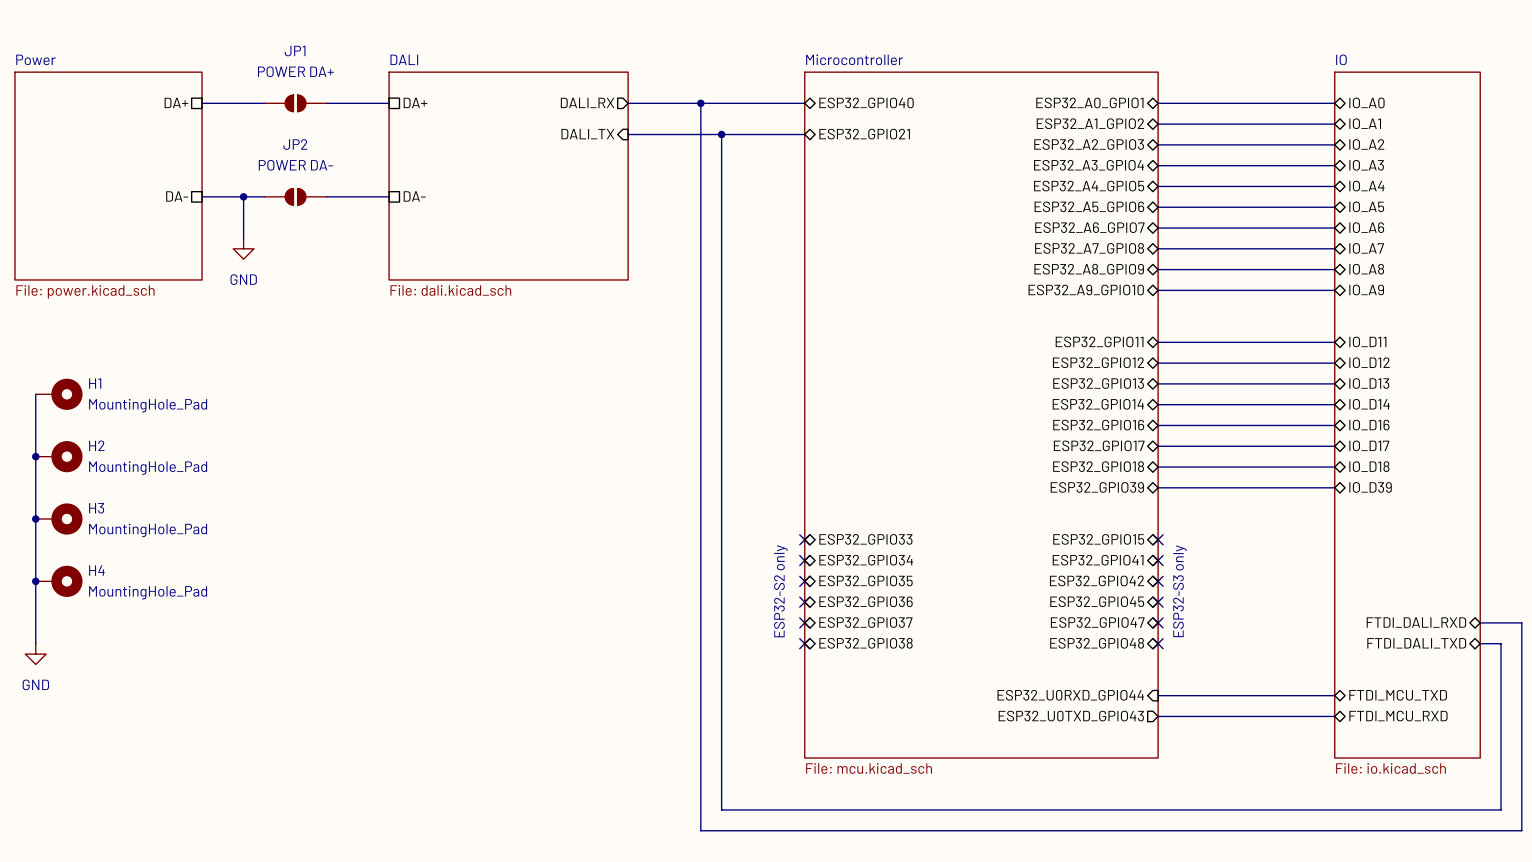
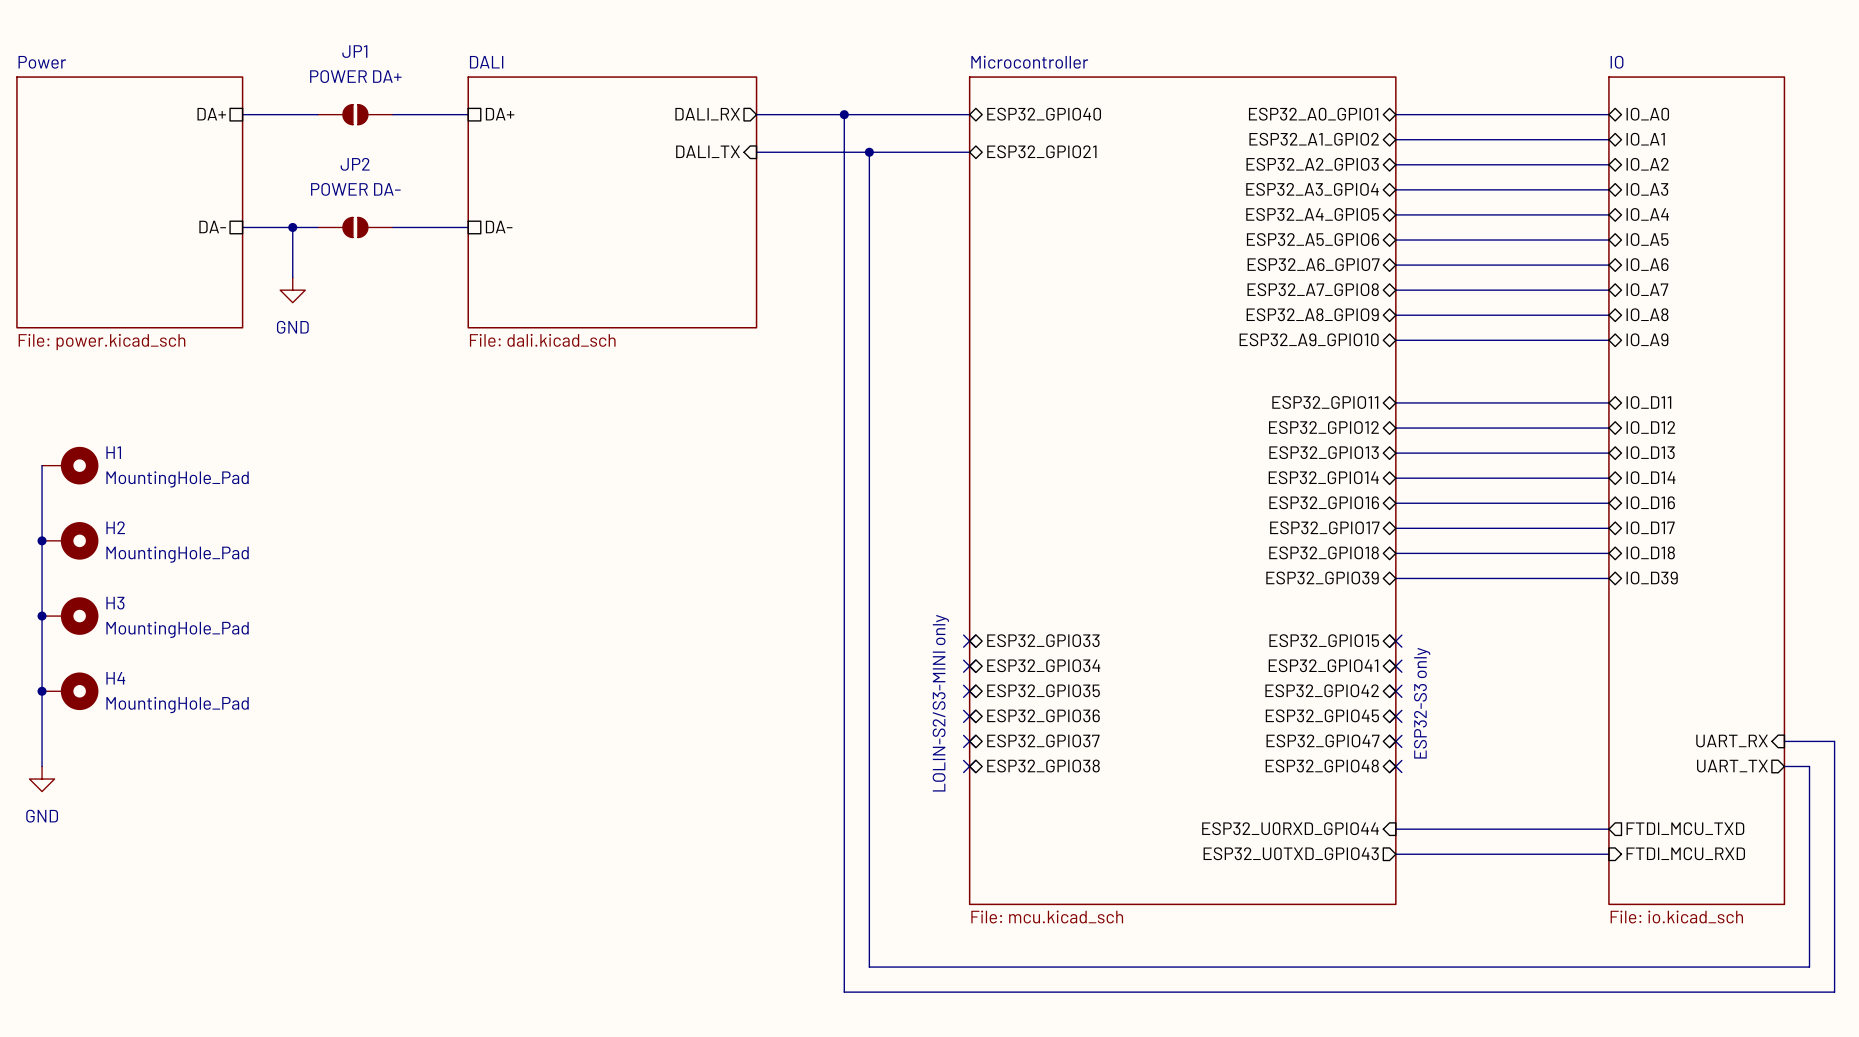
text: ESP32-S2 only (780, 591) -> LOLIN-S2/S3-MINI only (940, 703)
sheet pin shape: bidirectional (1416, 622) -> input (1732, 741)
sheet pin: FTDI_DALI_RXD (1416, 622) -> UART_RX (1732, 741)
sheet pin shape: bidirectional (1416, 643) -> output (1732, 766)
sheet pin: FTDI_DALI_TXD (1416, 643) -> UART_TX (1732, 766)
sheet pin shape: bidirectional (1398, 695) -> output (1685, 828)
sheet pin shape: bidirectional (1398, 716) -> input (1685, 853)

